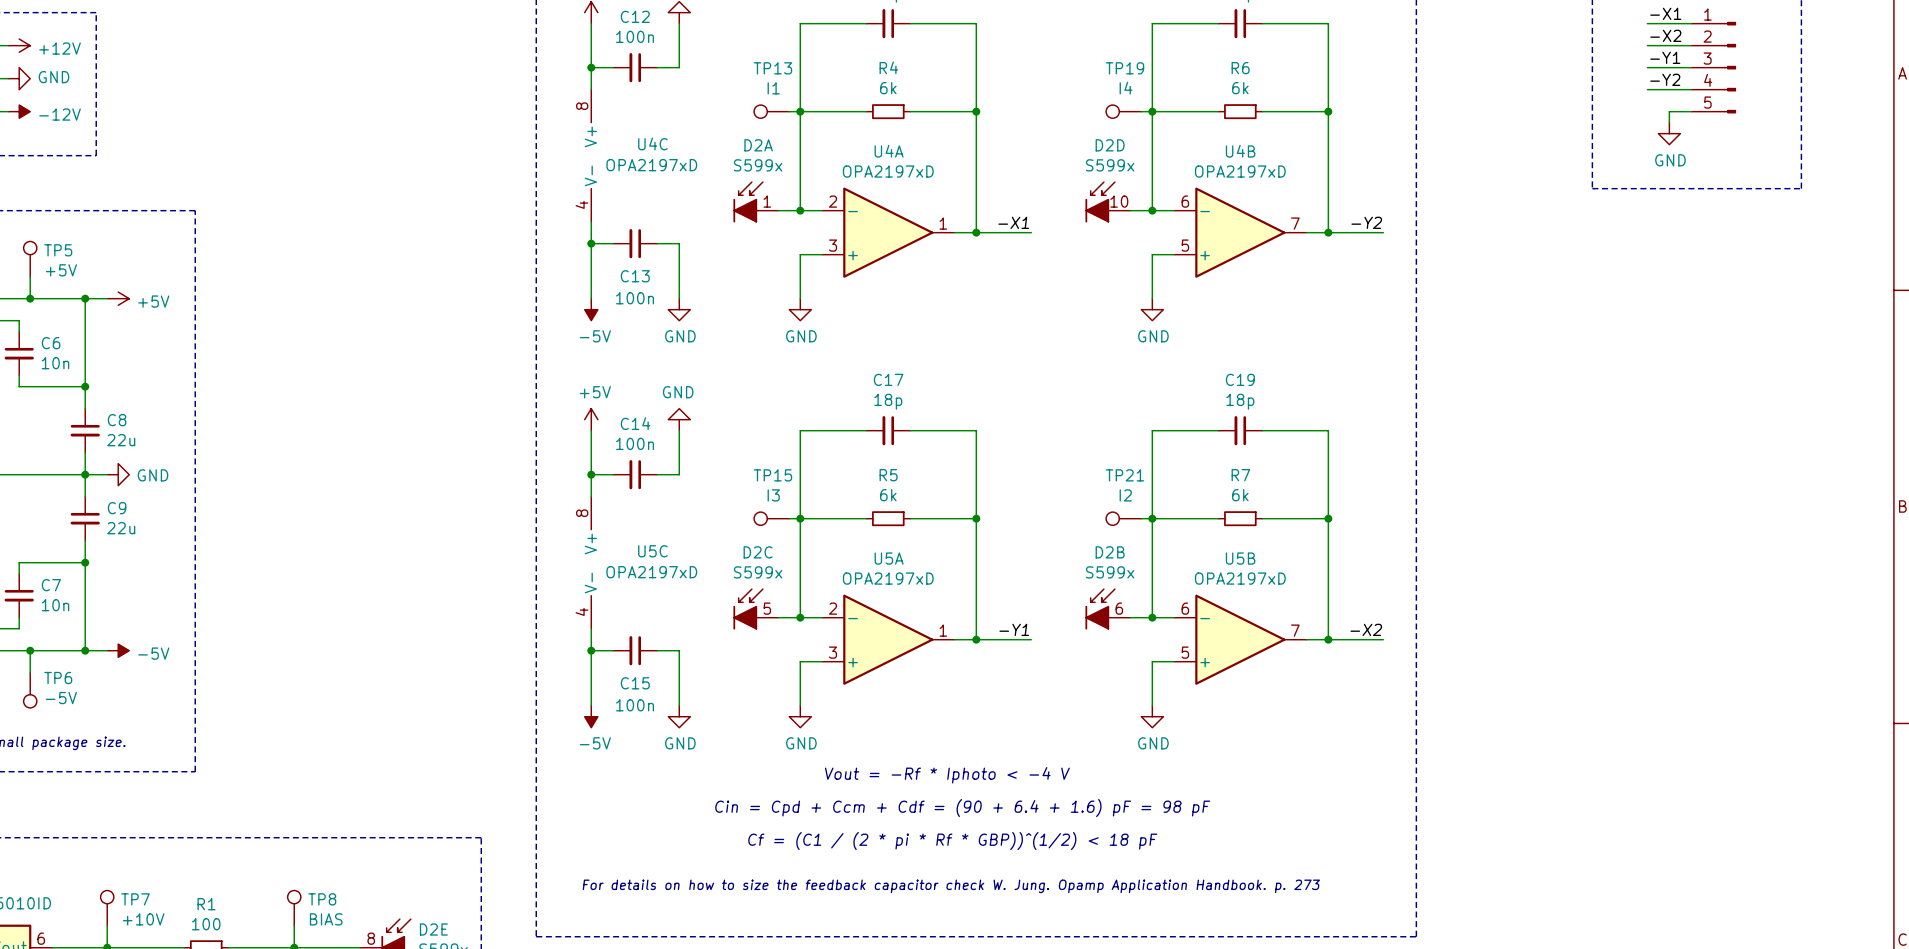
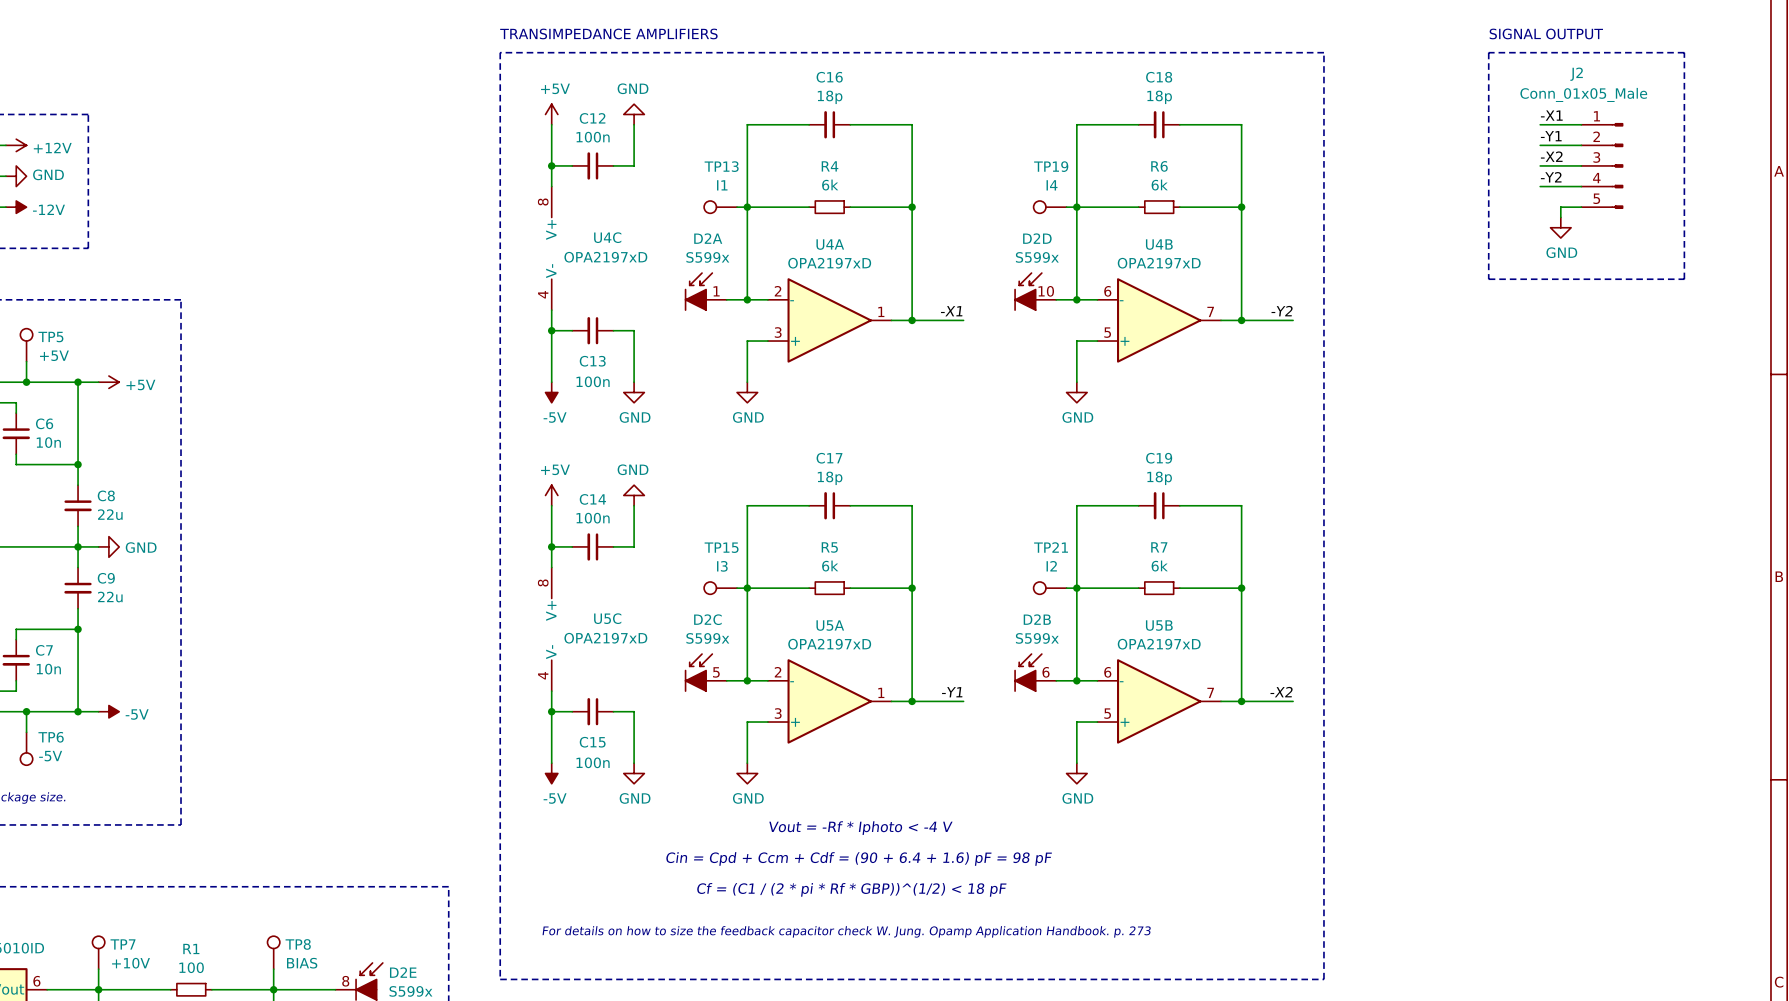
label: -X2 (1665, 35) -> -Y1 (1551, 136)
label: -Y1 (1665, 57) -> -X2 (1551, 156)

